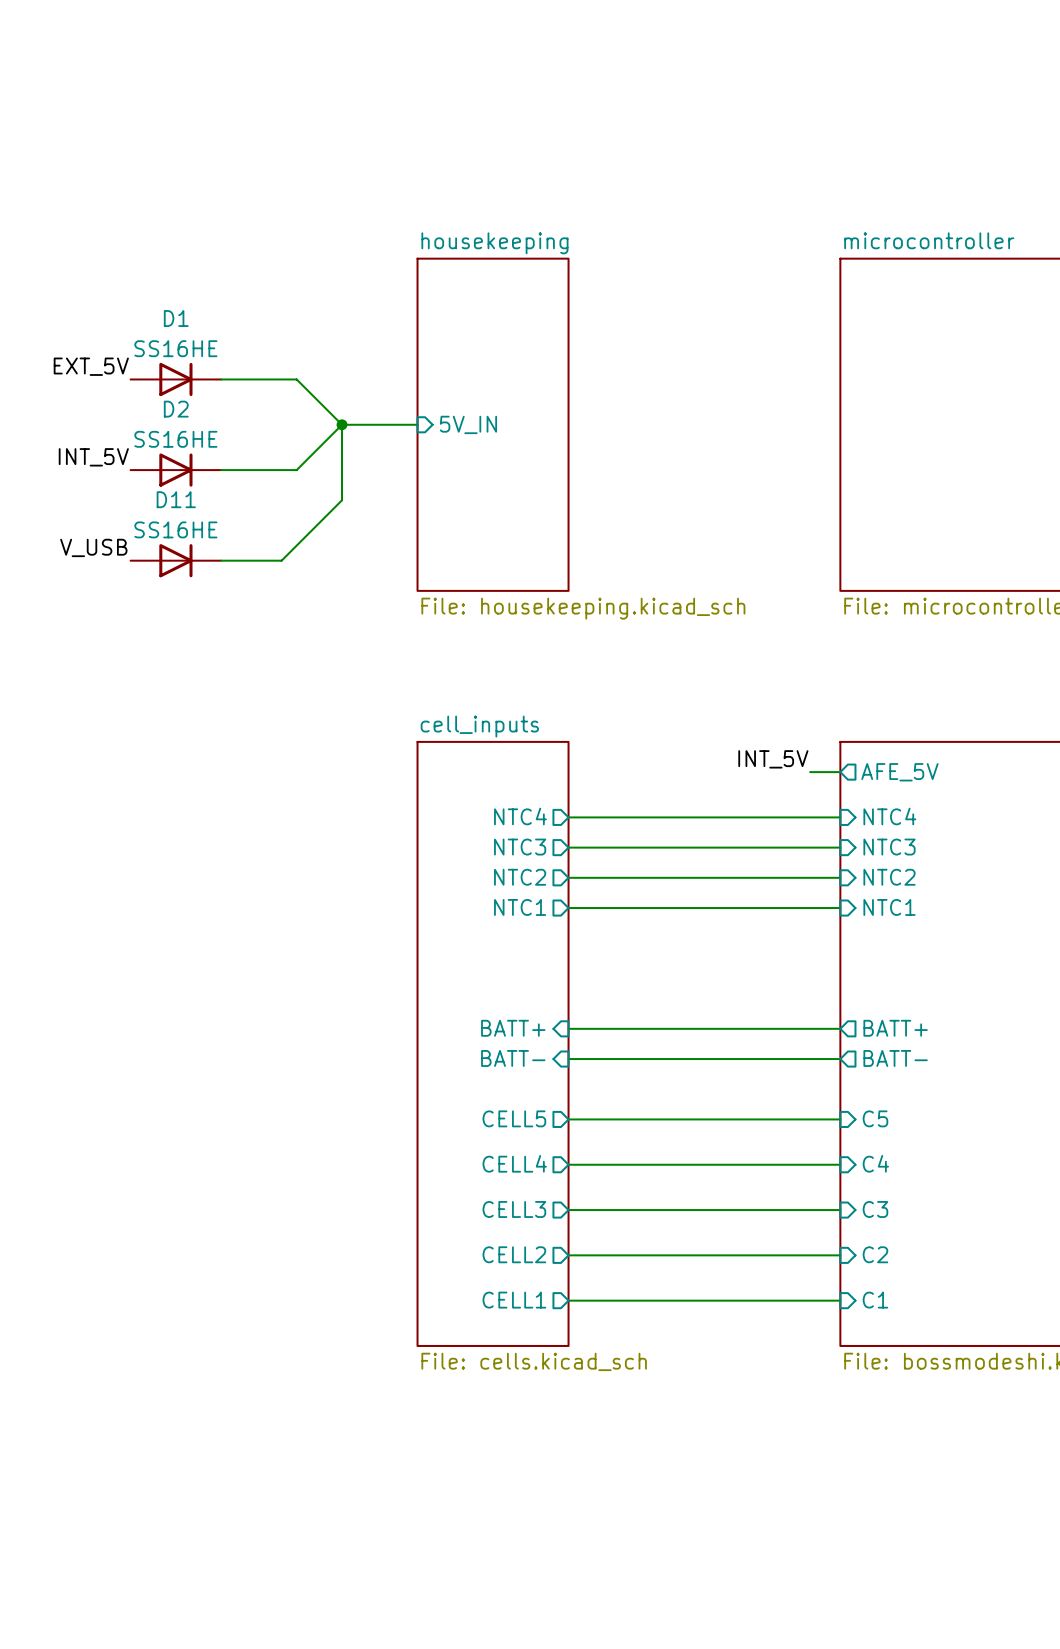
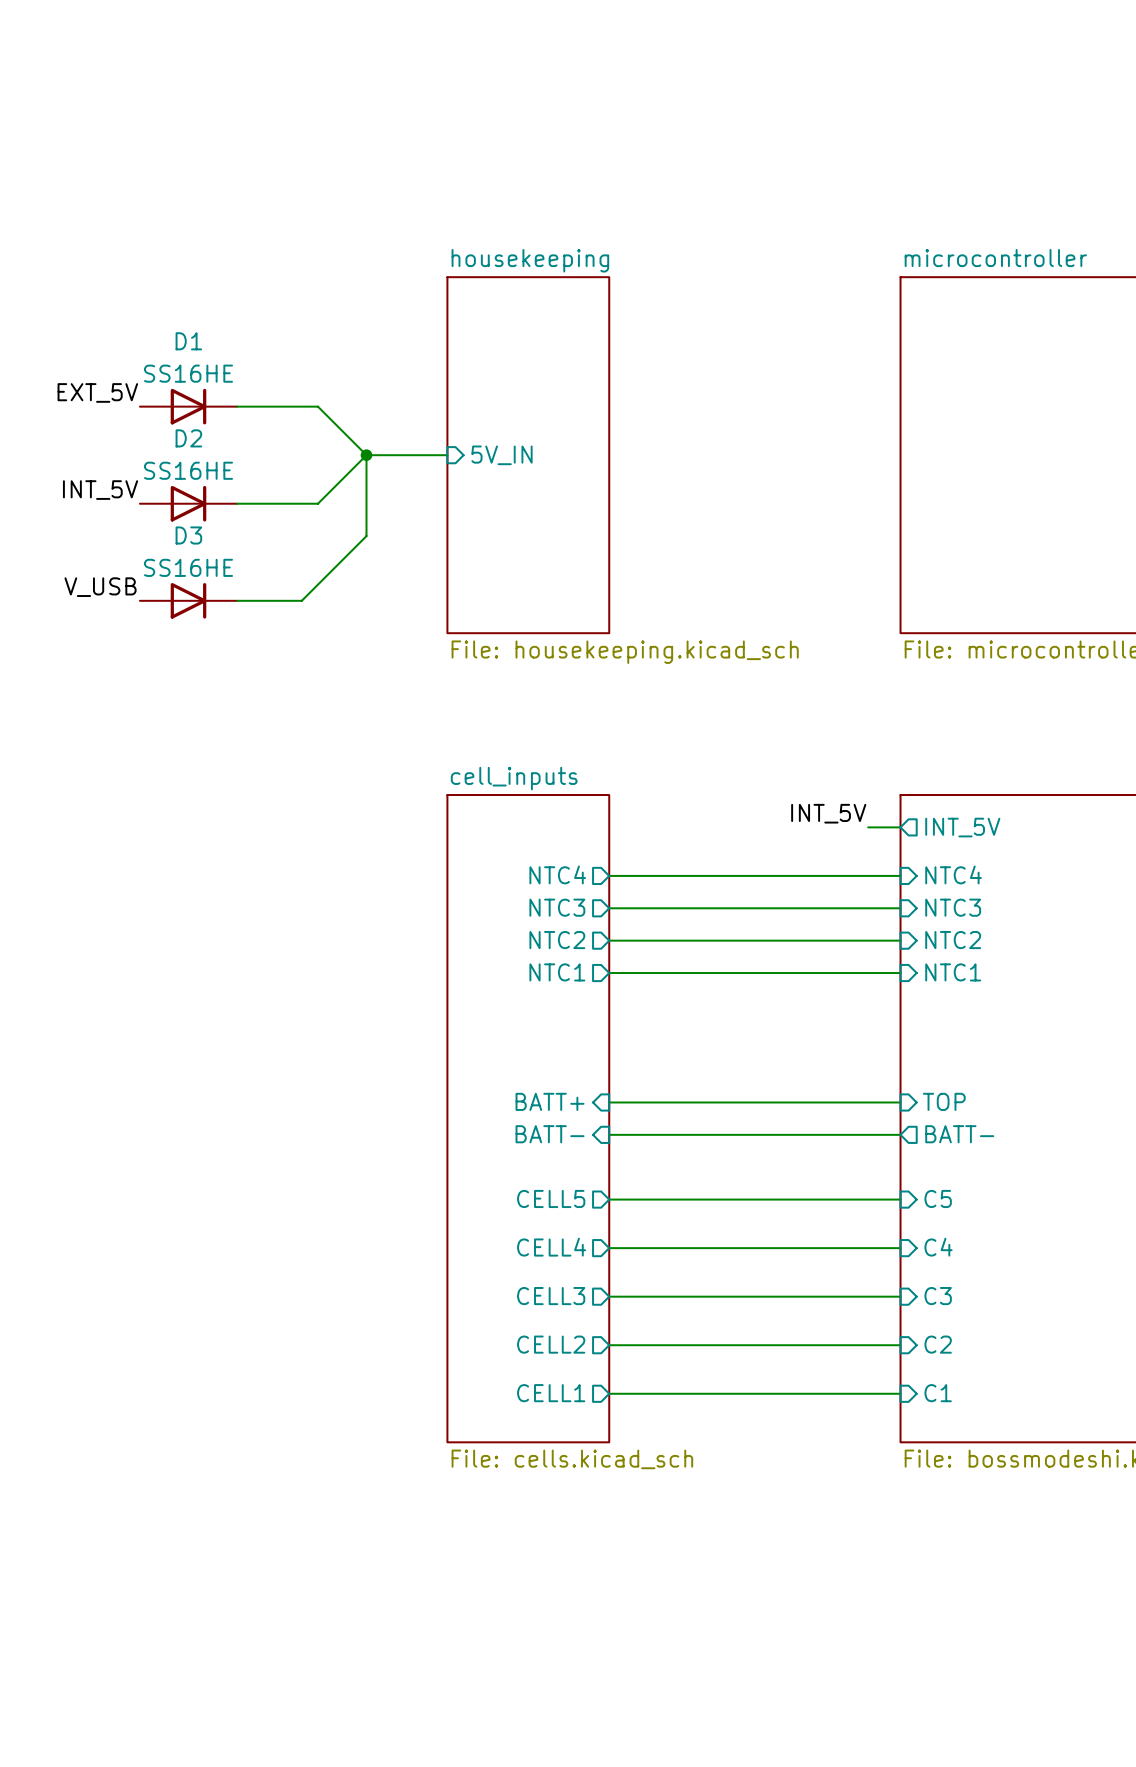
D11 name: D11 (176, 499) -> D3 (188, 535)
sheet pin: AFE_5V (899, 772) -> INT_5V (962, 827)
sheet pin shape: output (895, 1028) -> input (944, 1101)
sheet pin: BATT+ (895, 1028) -> TOP (944, 1101)

